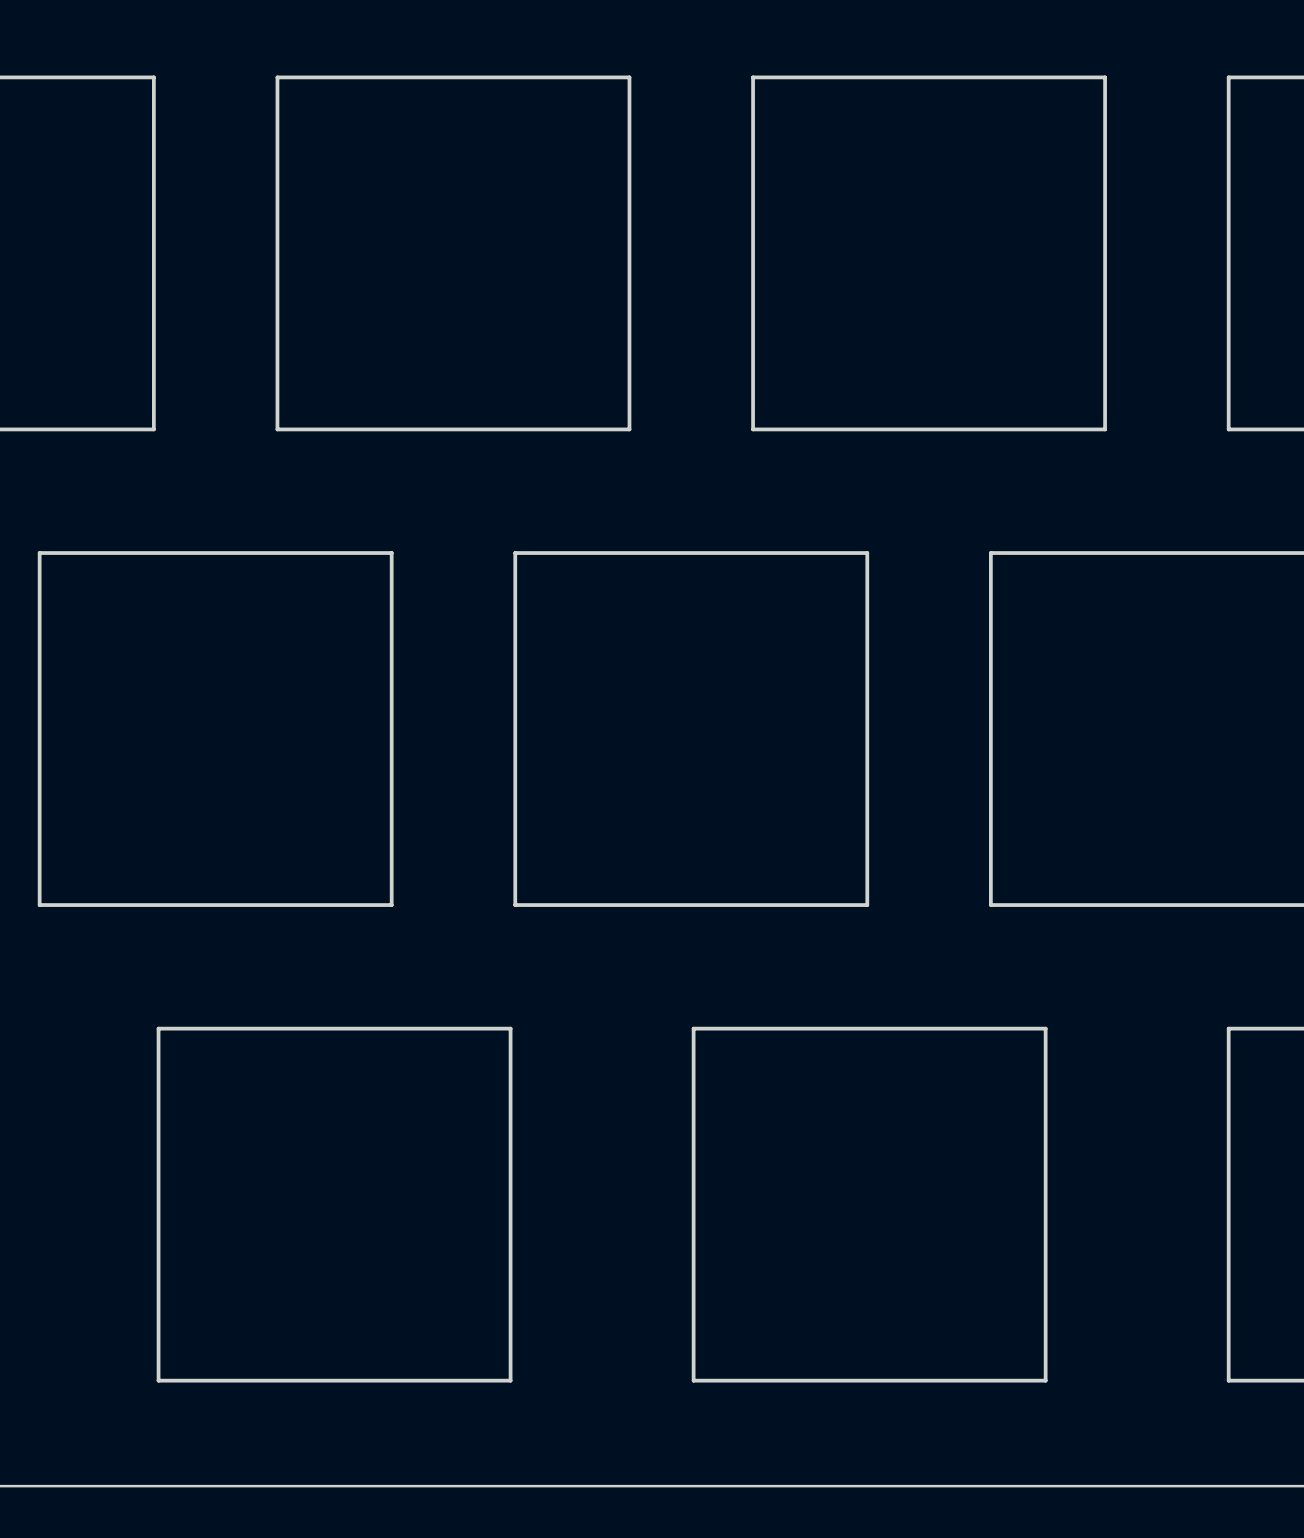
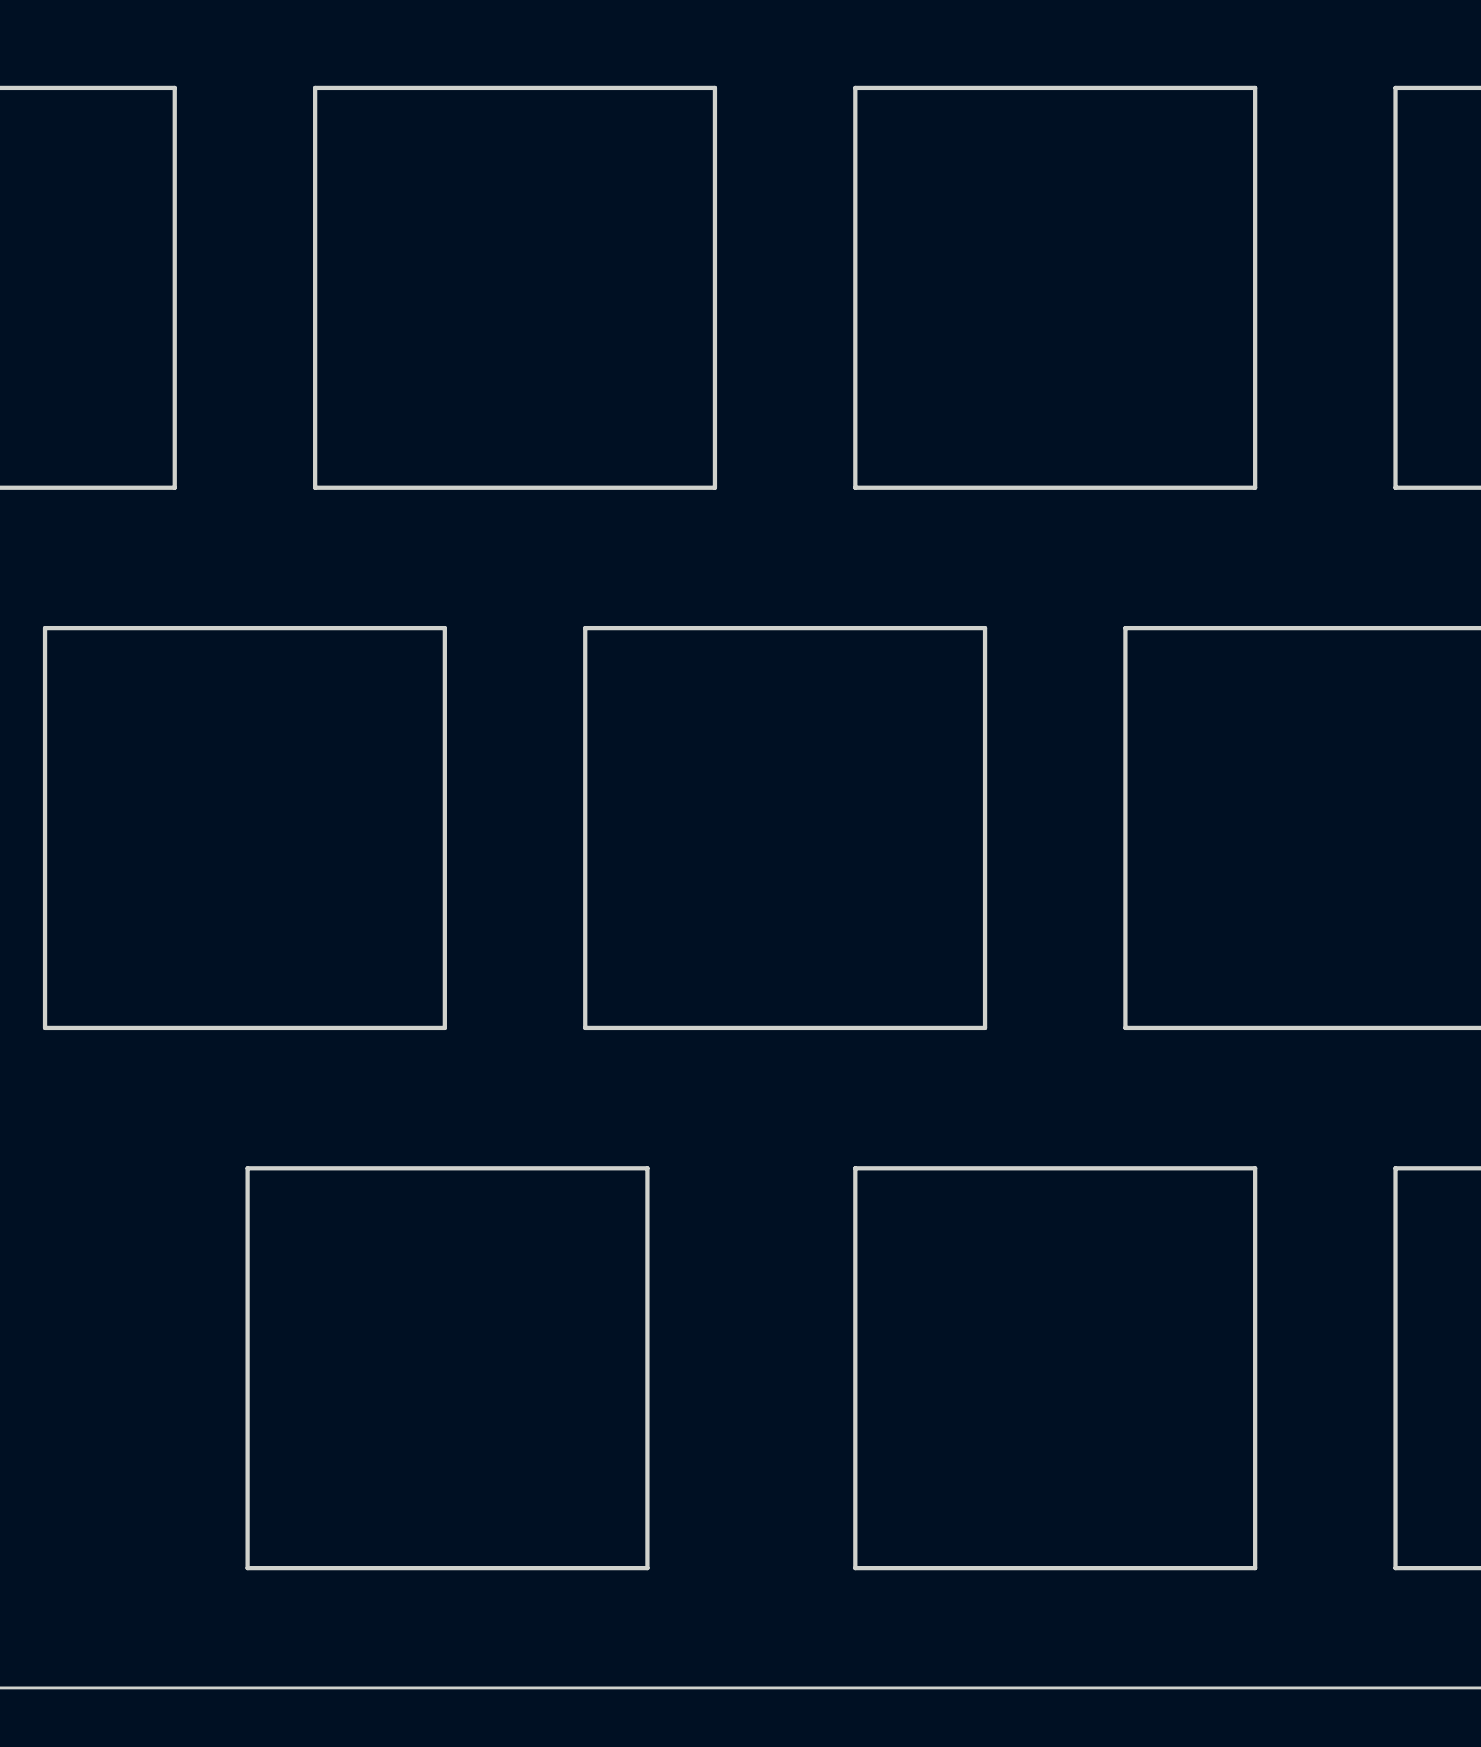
drawing position: (334, 1204) -> (447, 1368)
drawing position: (869, 1204) -> (1055, 1368)

